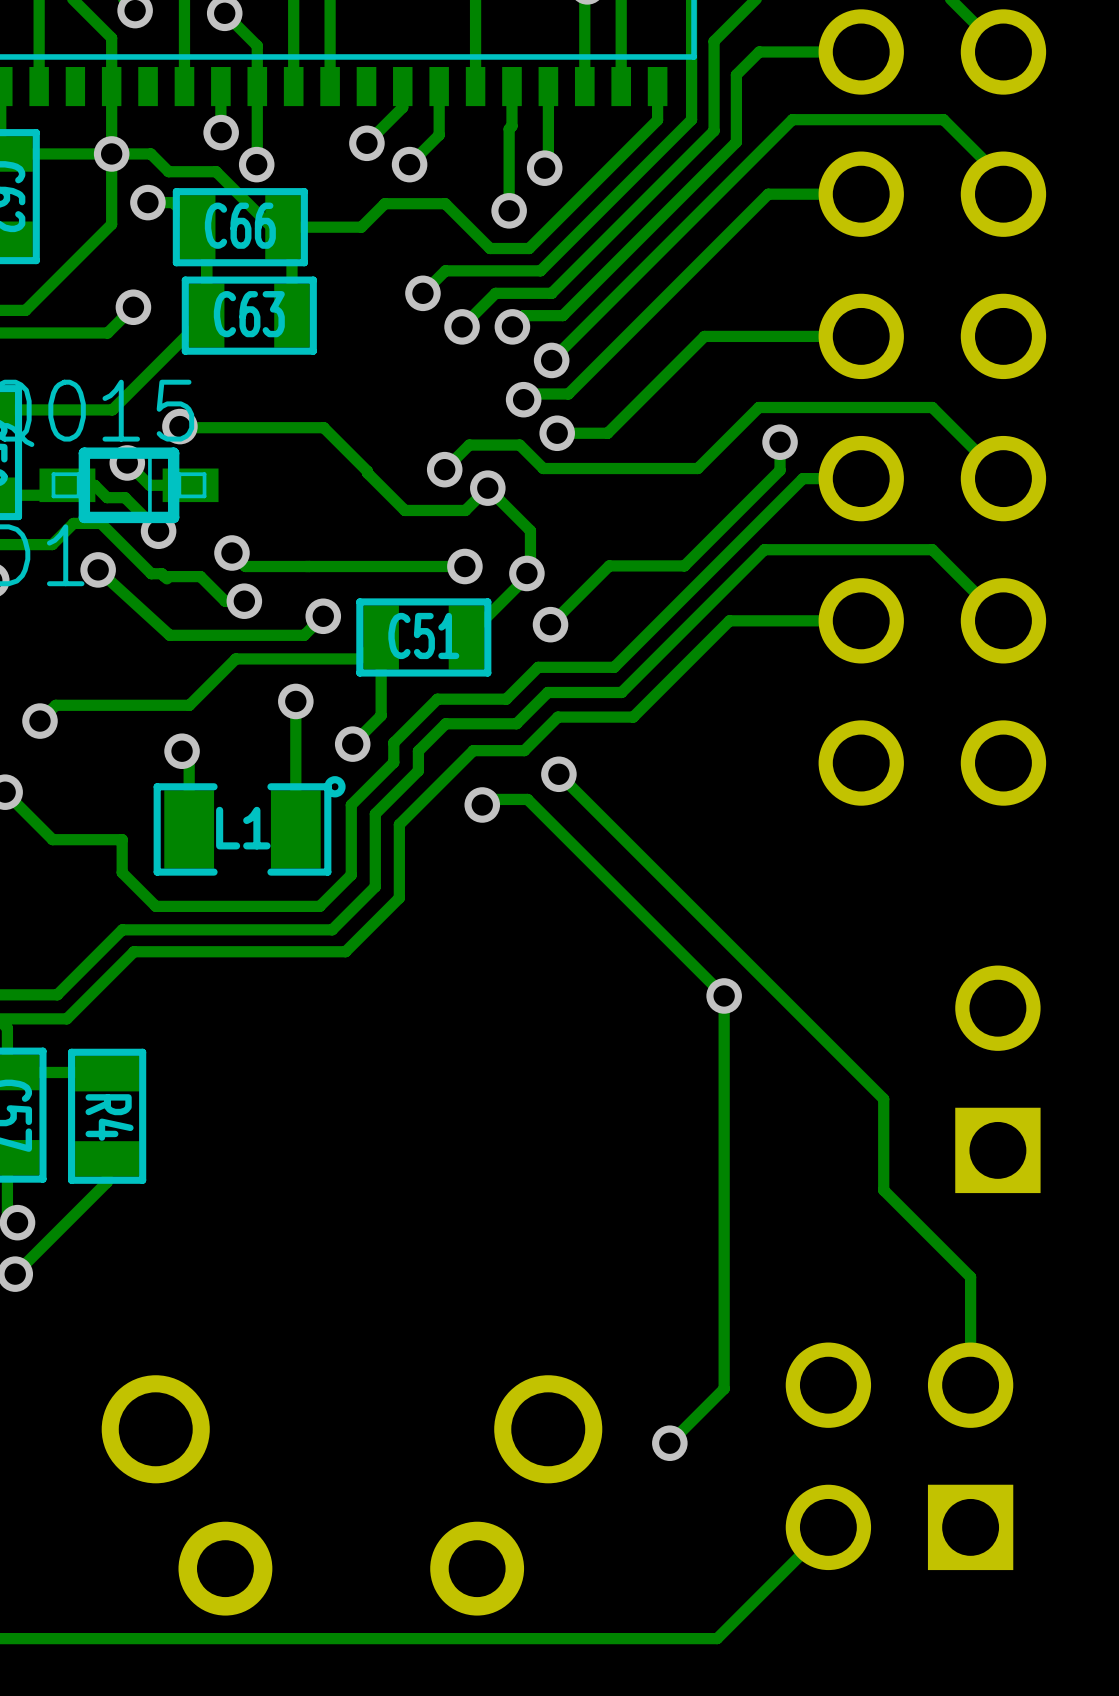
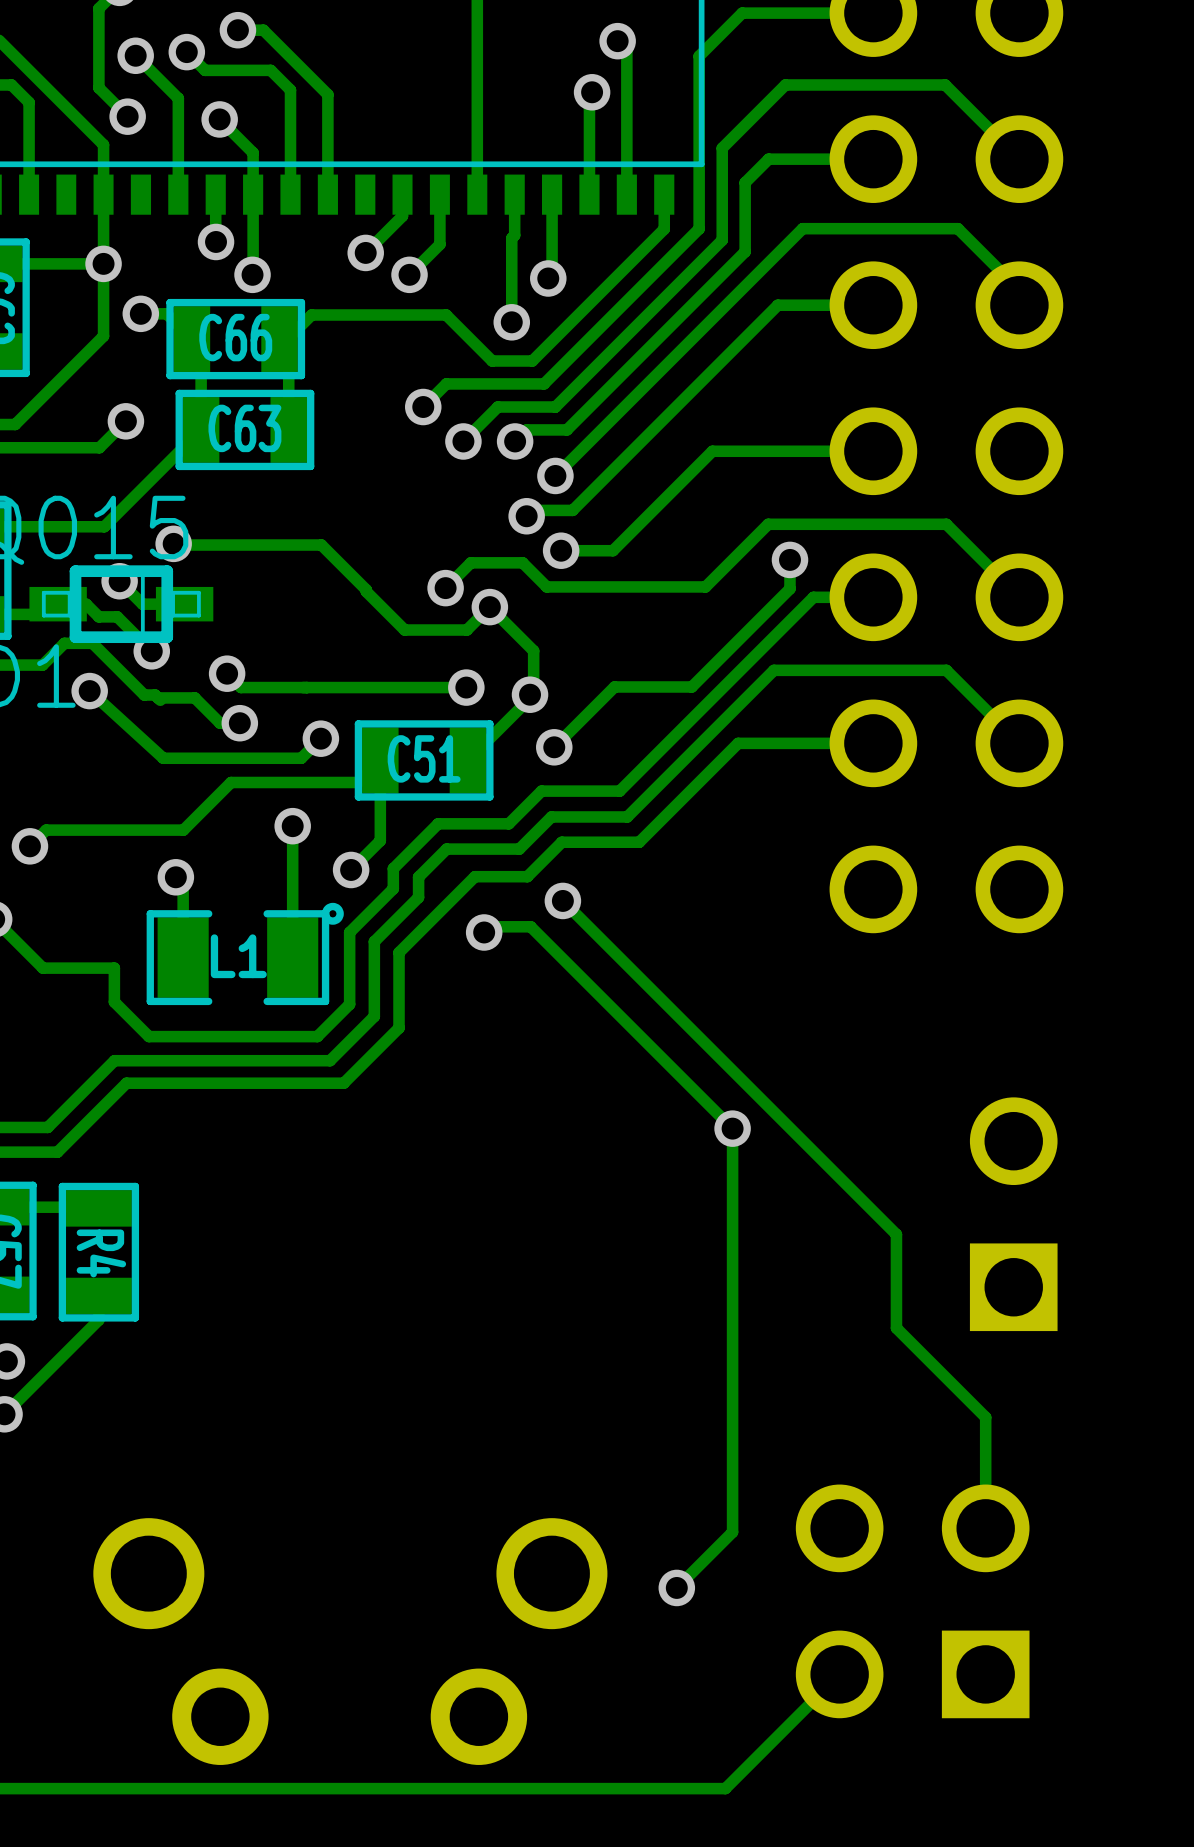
track: (111, 153) (150, 153) (168, 171) (216, 171) (271, 227) (361, 227) (384, 203) -> (288, 337) (311, 315) (384, 315)

